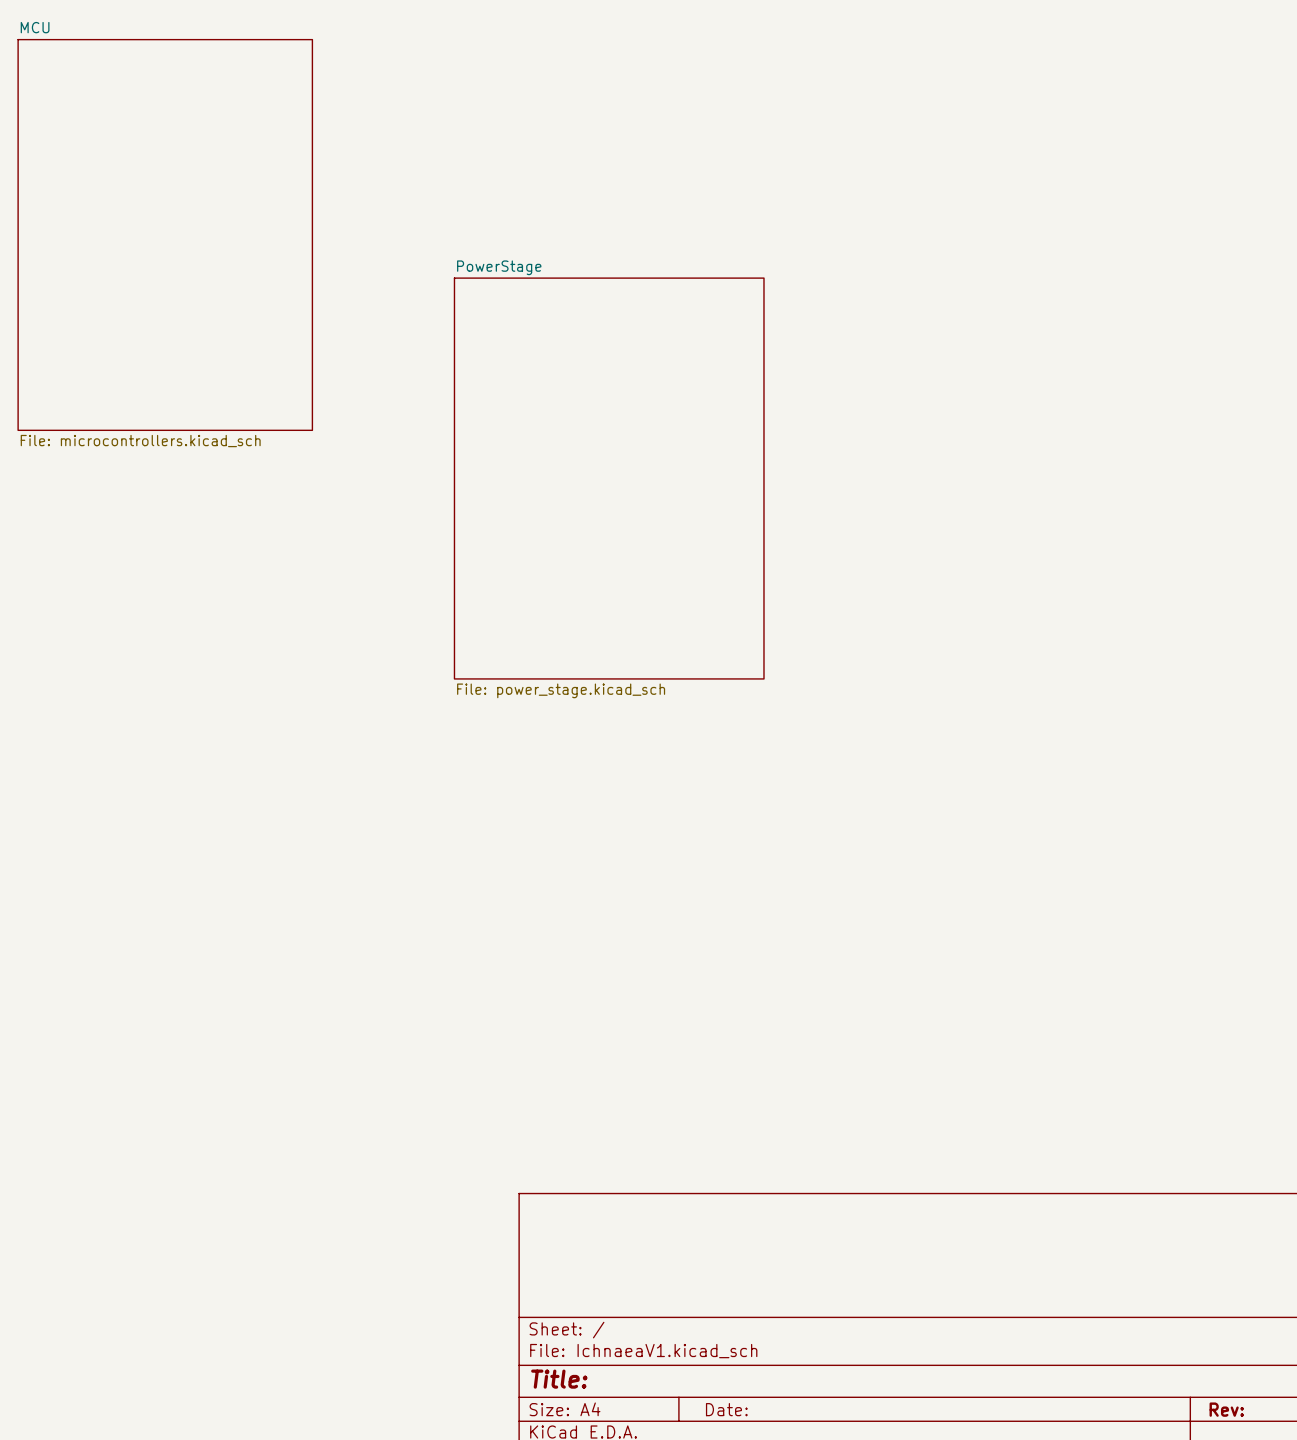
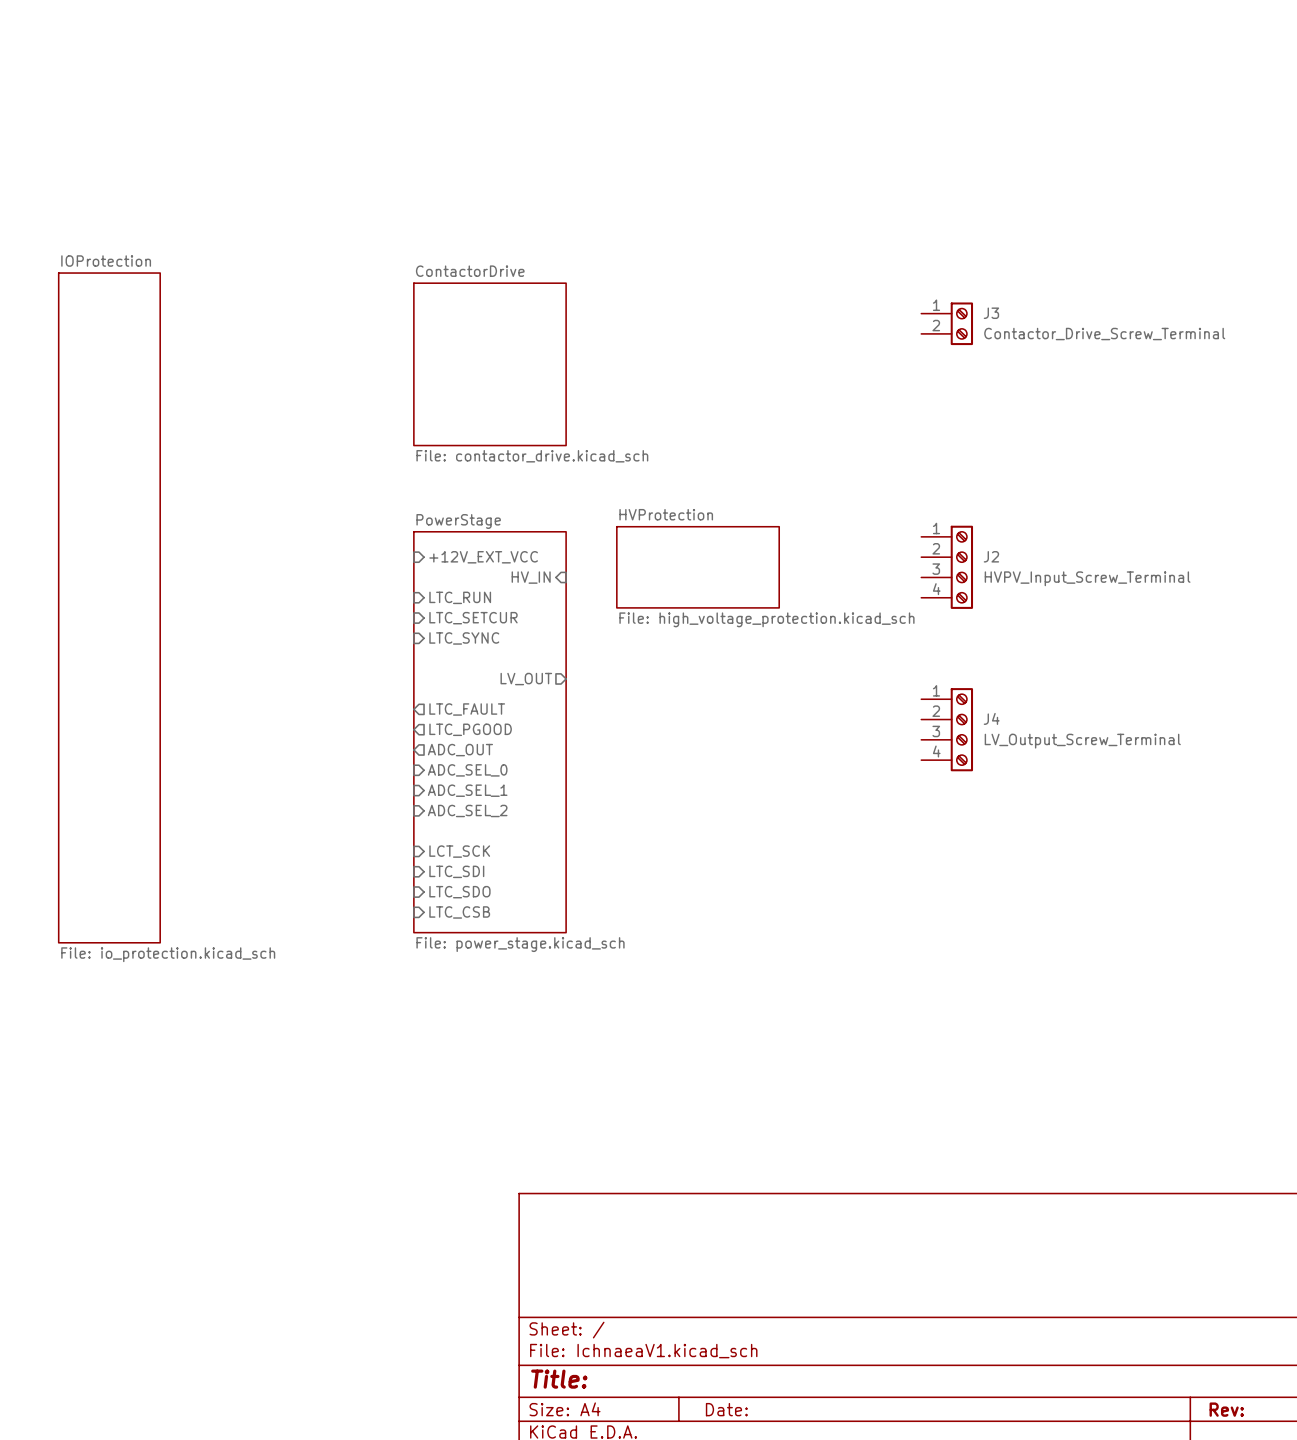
sheet MCU: File: microcontrollers.kicad_sch (165, 234) -> none
J3: none -> Contactor_Drive_Screw_Terminal (947, 323)
sheet ContactorDrive: none -> File: contactor_drive.kicad_sch (489, 364)
sheet PowerStage: File: power_stage.kicad_sch (609, 478) -> none
sheet pin: none -> +12V_EXT_VCC (483, 557)
sheet HVProtection: none -> File: high_voltage_protection.kicad_sch (698, 567)
J2: none -> HVPV_Input_Screw_Terminal (947, 567)
sheet pin: none -> HV_IN (531, 577)
sheet pin: none -> LTC_RUN (460, 597)
sheet IOProtection: none -> File: io_protection.kicad_sch (109, 607)
sheet pin: none -> LTC_SETCUR (473, 618)
sheet pin: none -> LTC_SYNC (464, 638)
sheet pin: none -> LV_OUT (526, 679)
sheet pin: none -> LTC_FAULT (467, 709)
sheet pin: none -> LTC_PGOOD (470, 729)
J4: none -> LV_Output_Screw_Terminal (947, 729)
sheet PowerStage: none -> File: power_stage.kicad_sch (489, 732)
sheet pin: none -> ADC_OUT (460, 750)
sheet pin: none -> ADC_SEL_0 (467, 770)
sheet pin: none -> ADC_SEL_1 (467, 790)
sheet pin: none -> ADC_SEL_2 (467, 810)
sheet pin: none -> LCT_SCK (459, 851)
sheet pin: none -> LTC_SDI (456, 871)
sheet pin: none -> LTC_SDO (459, 892)
sheet pin: none -> LTC_CSB (459, 912)

